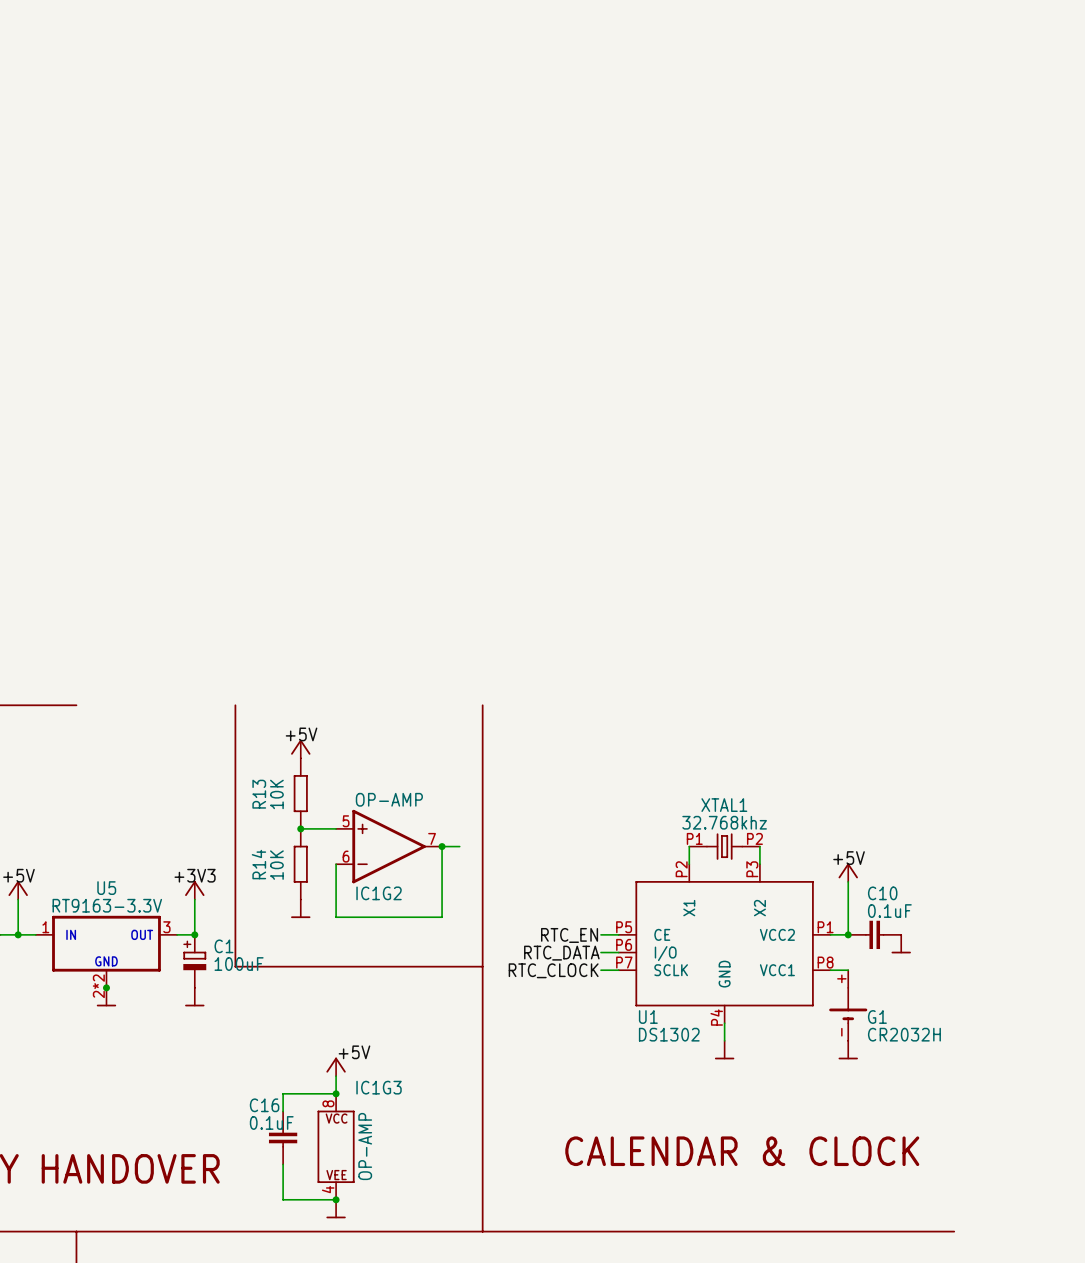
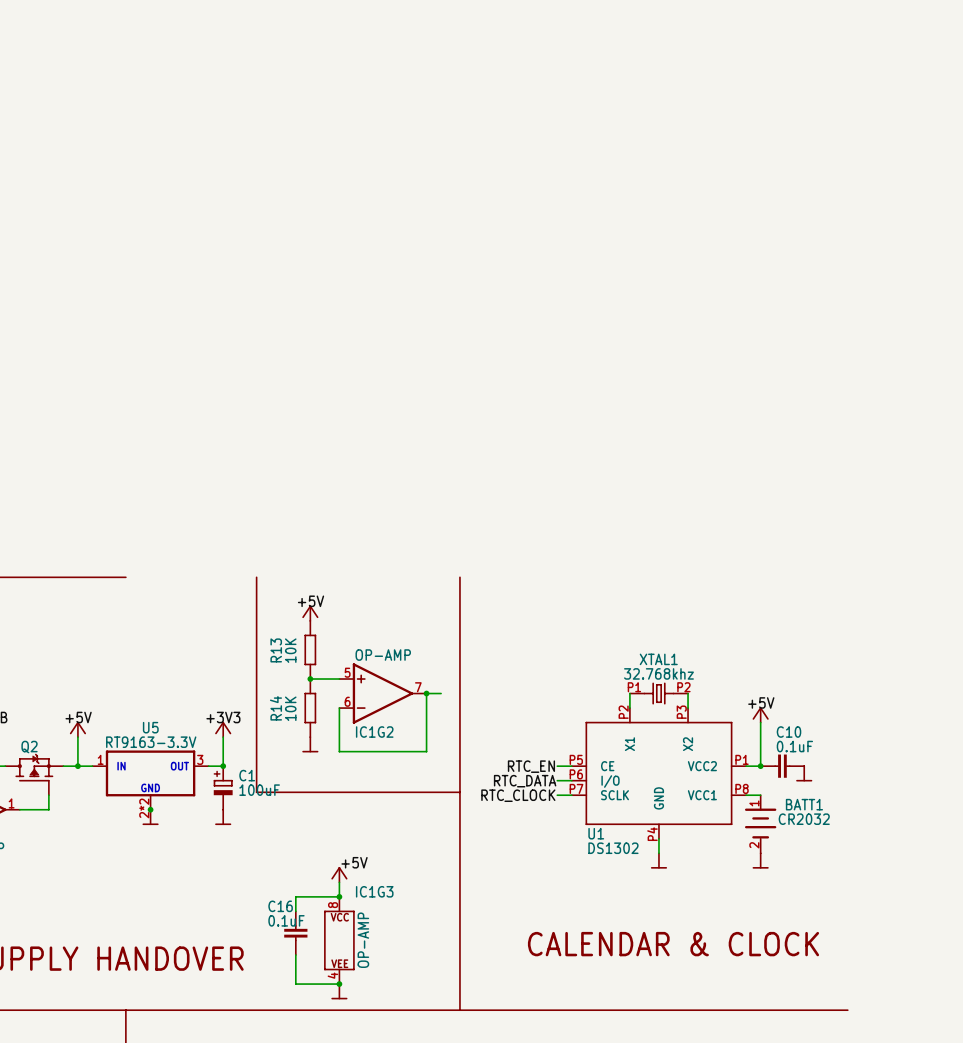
G1: CR2032H (848, 1005) -> none
BATT1: none -> CR2032 (760, 824)

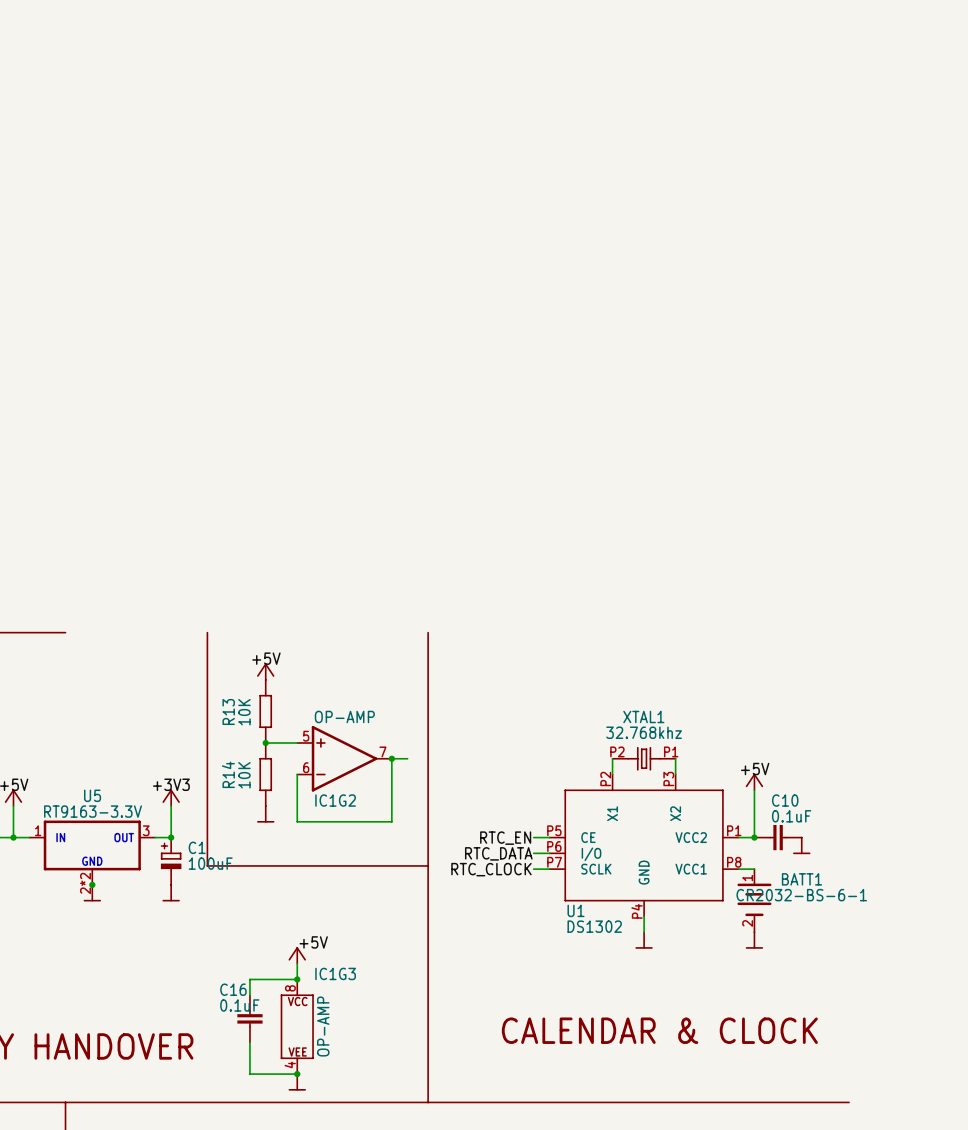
XTAL1 rotation: 0° (658, 693) -> 180° (644, 758)
BATT1 value: CR2032 (804, 819) -> CR2032-BS-6-1 (801, 895)

